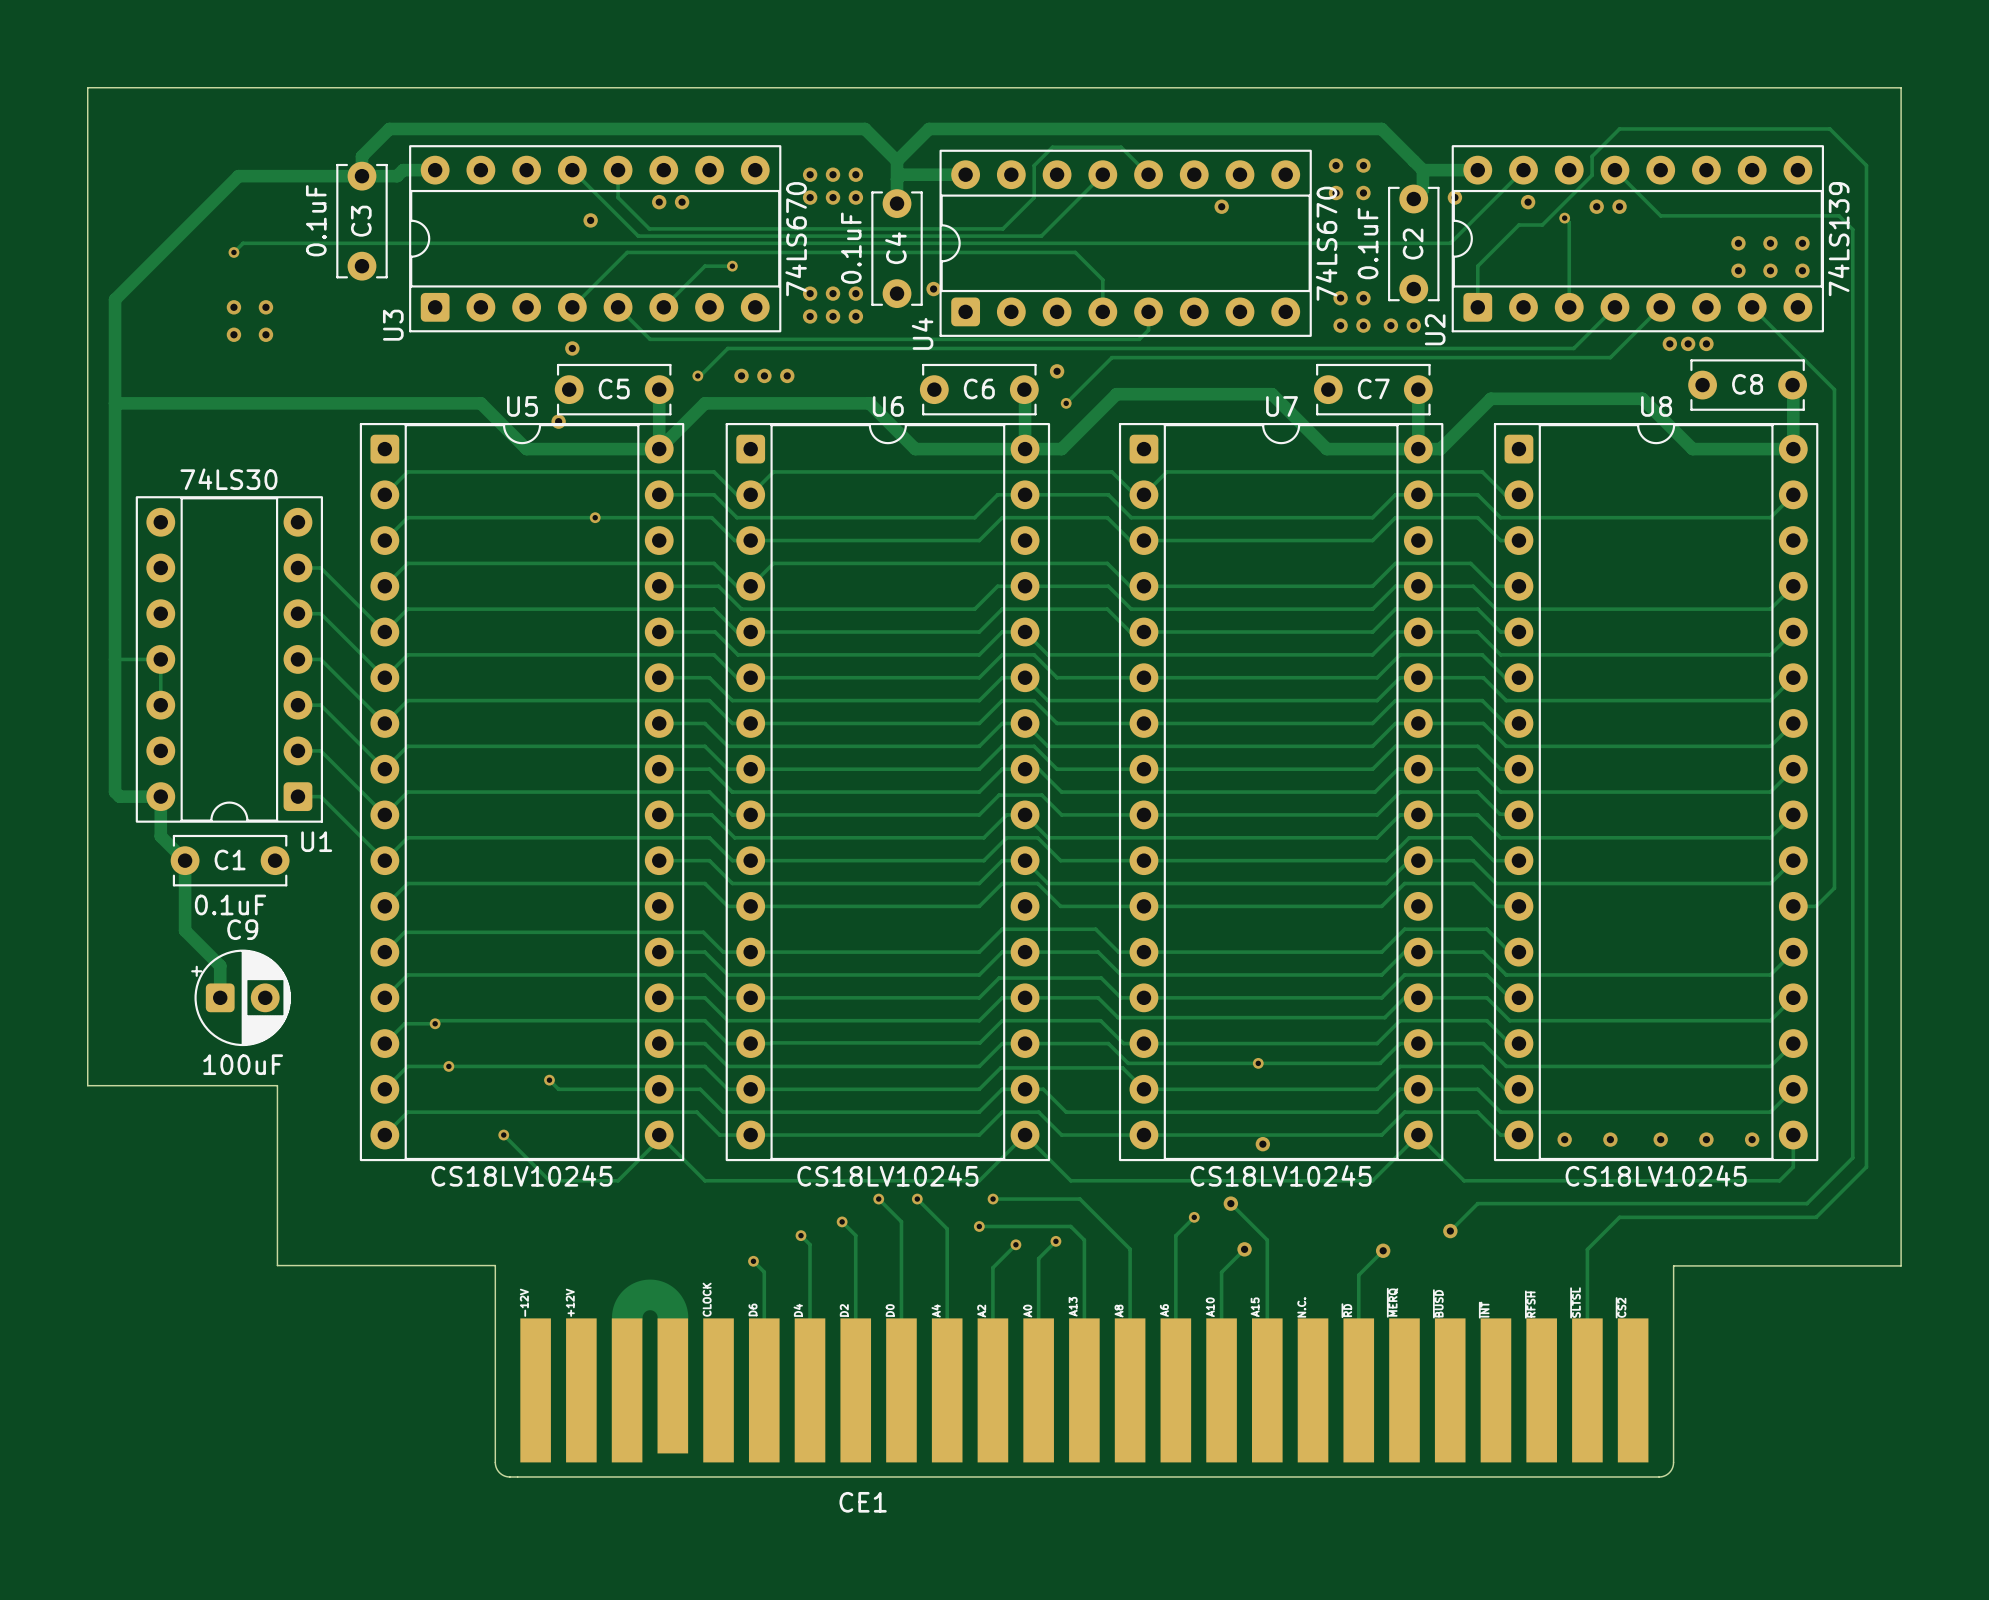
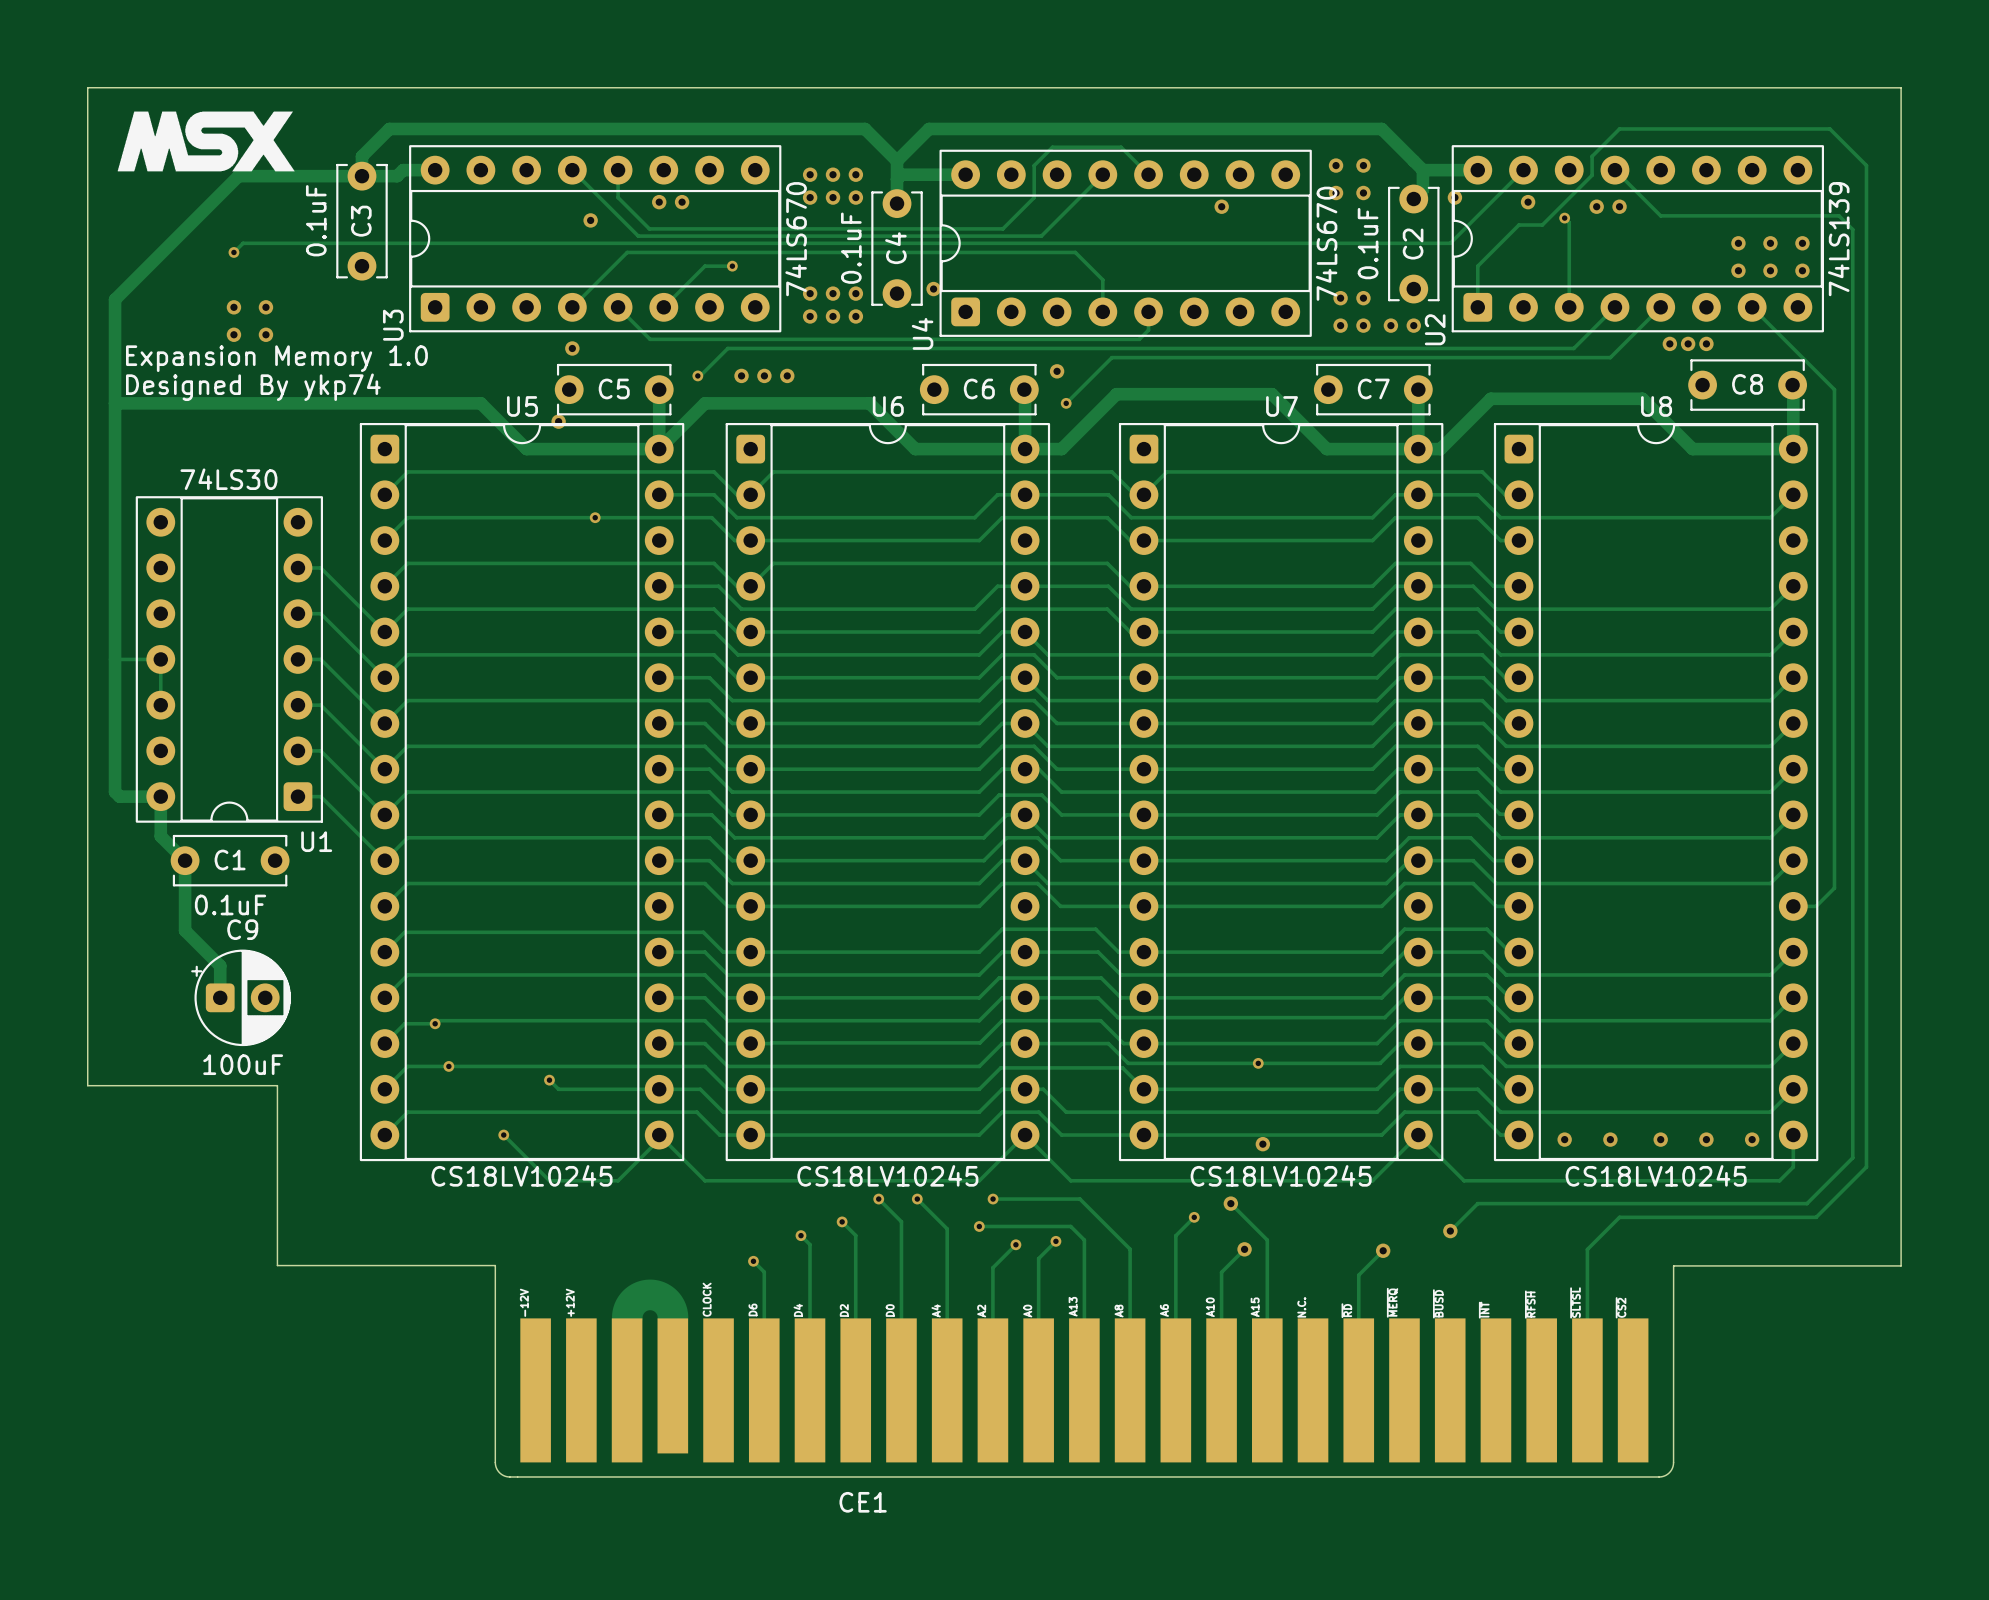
drawing: none -> [117, 111, 295, 172]
text: none -> Expansion Memory 1.0 (276, 358)
text: none -> Designed By ykp74 (253, 387)

